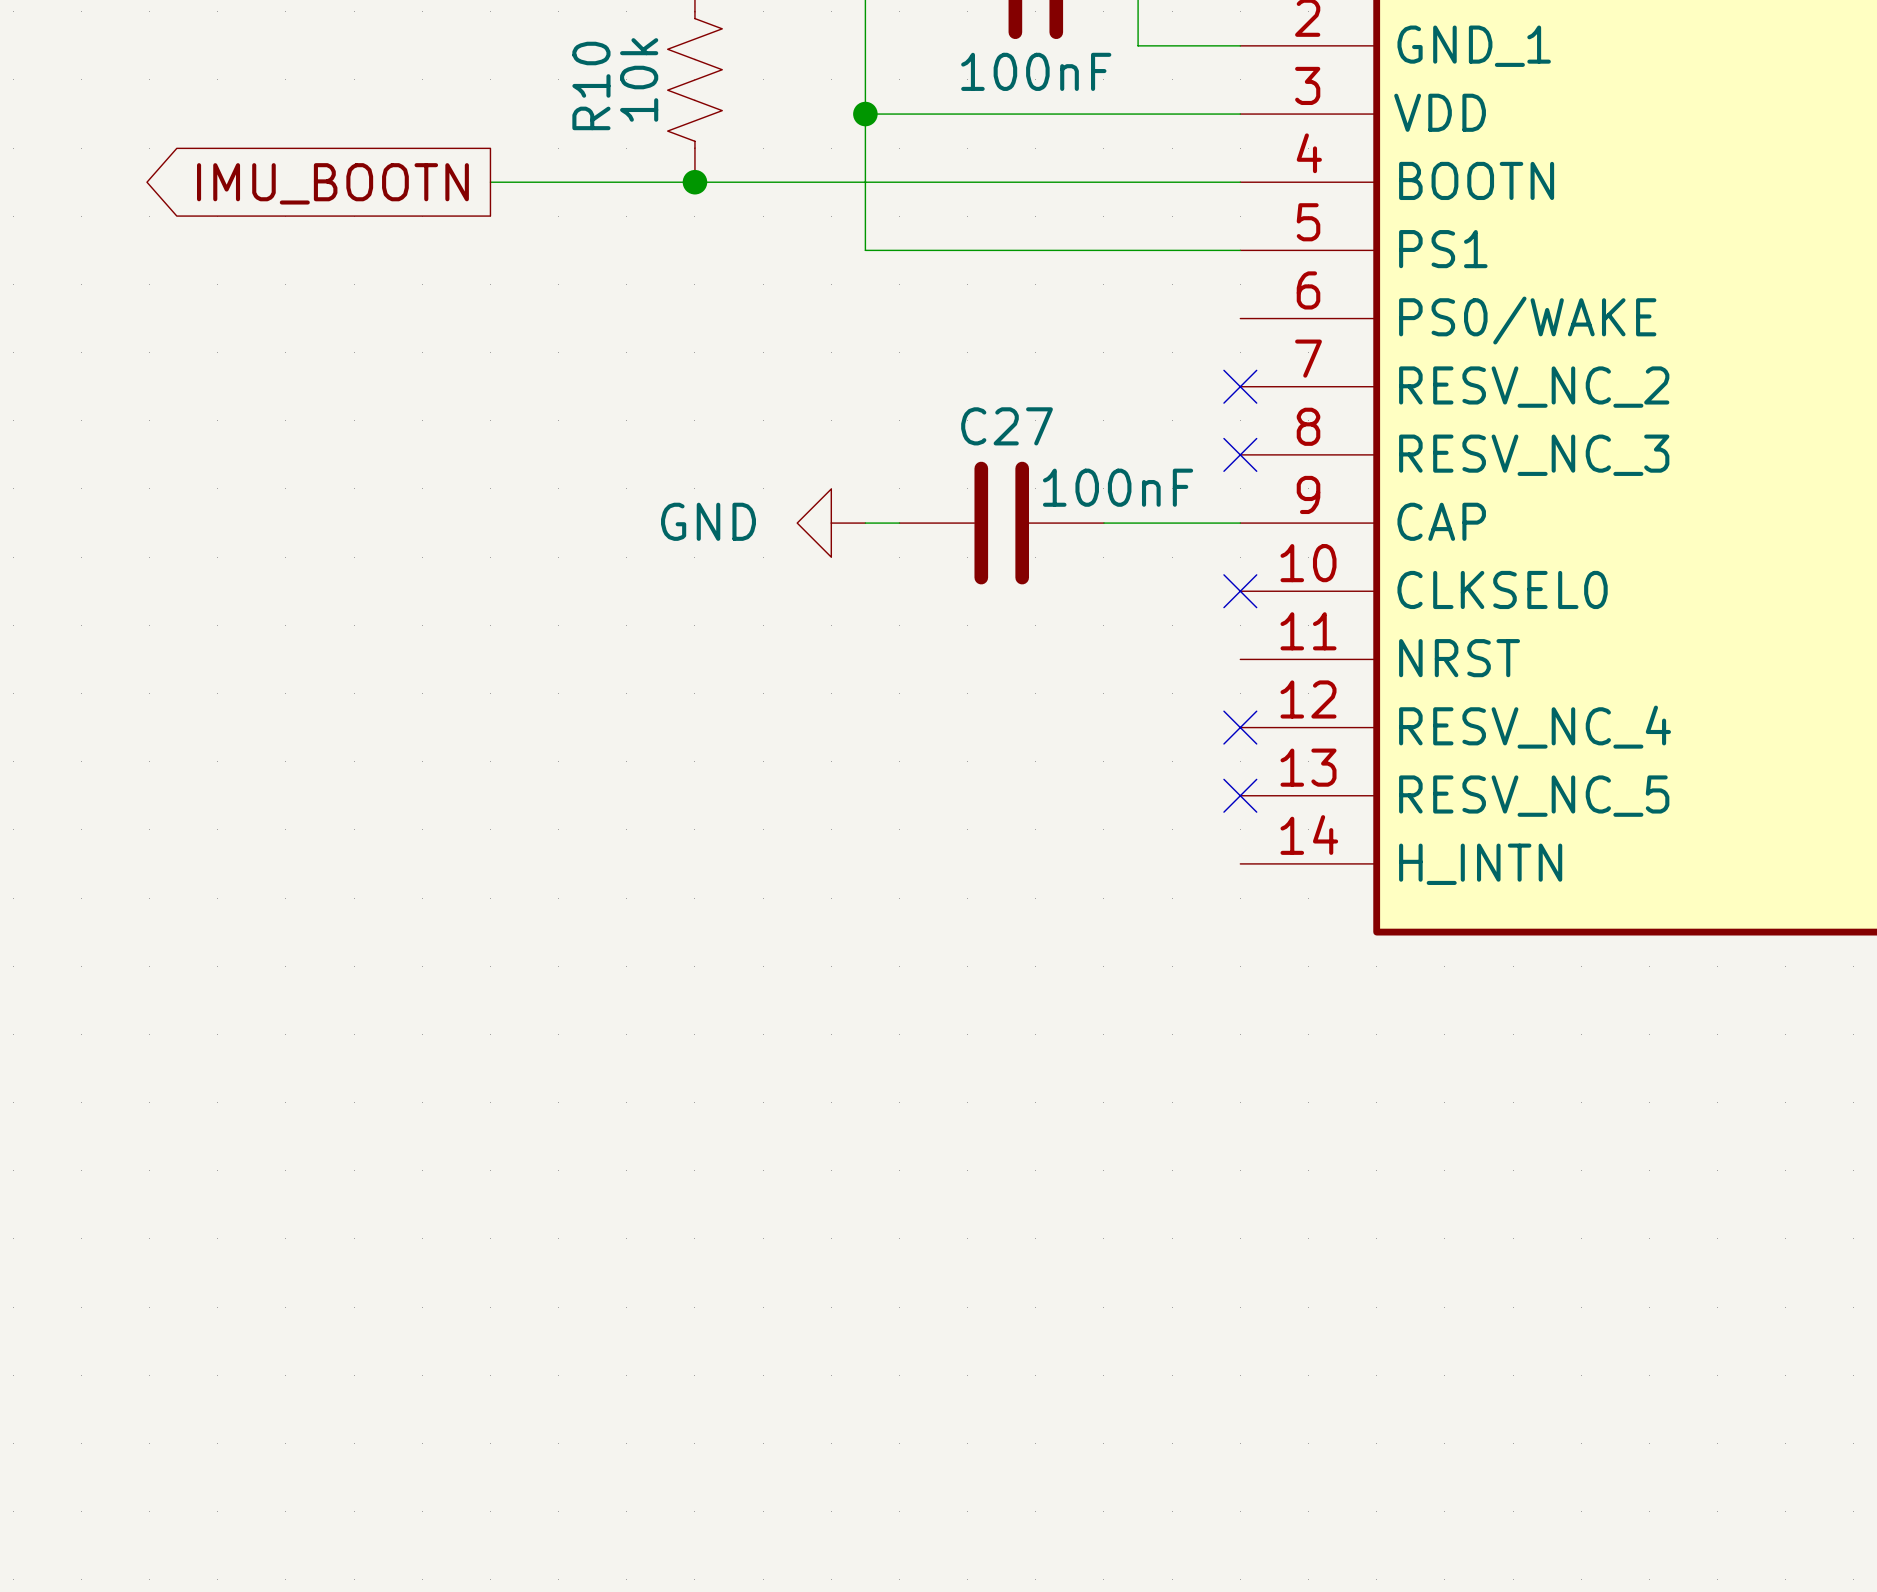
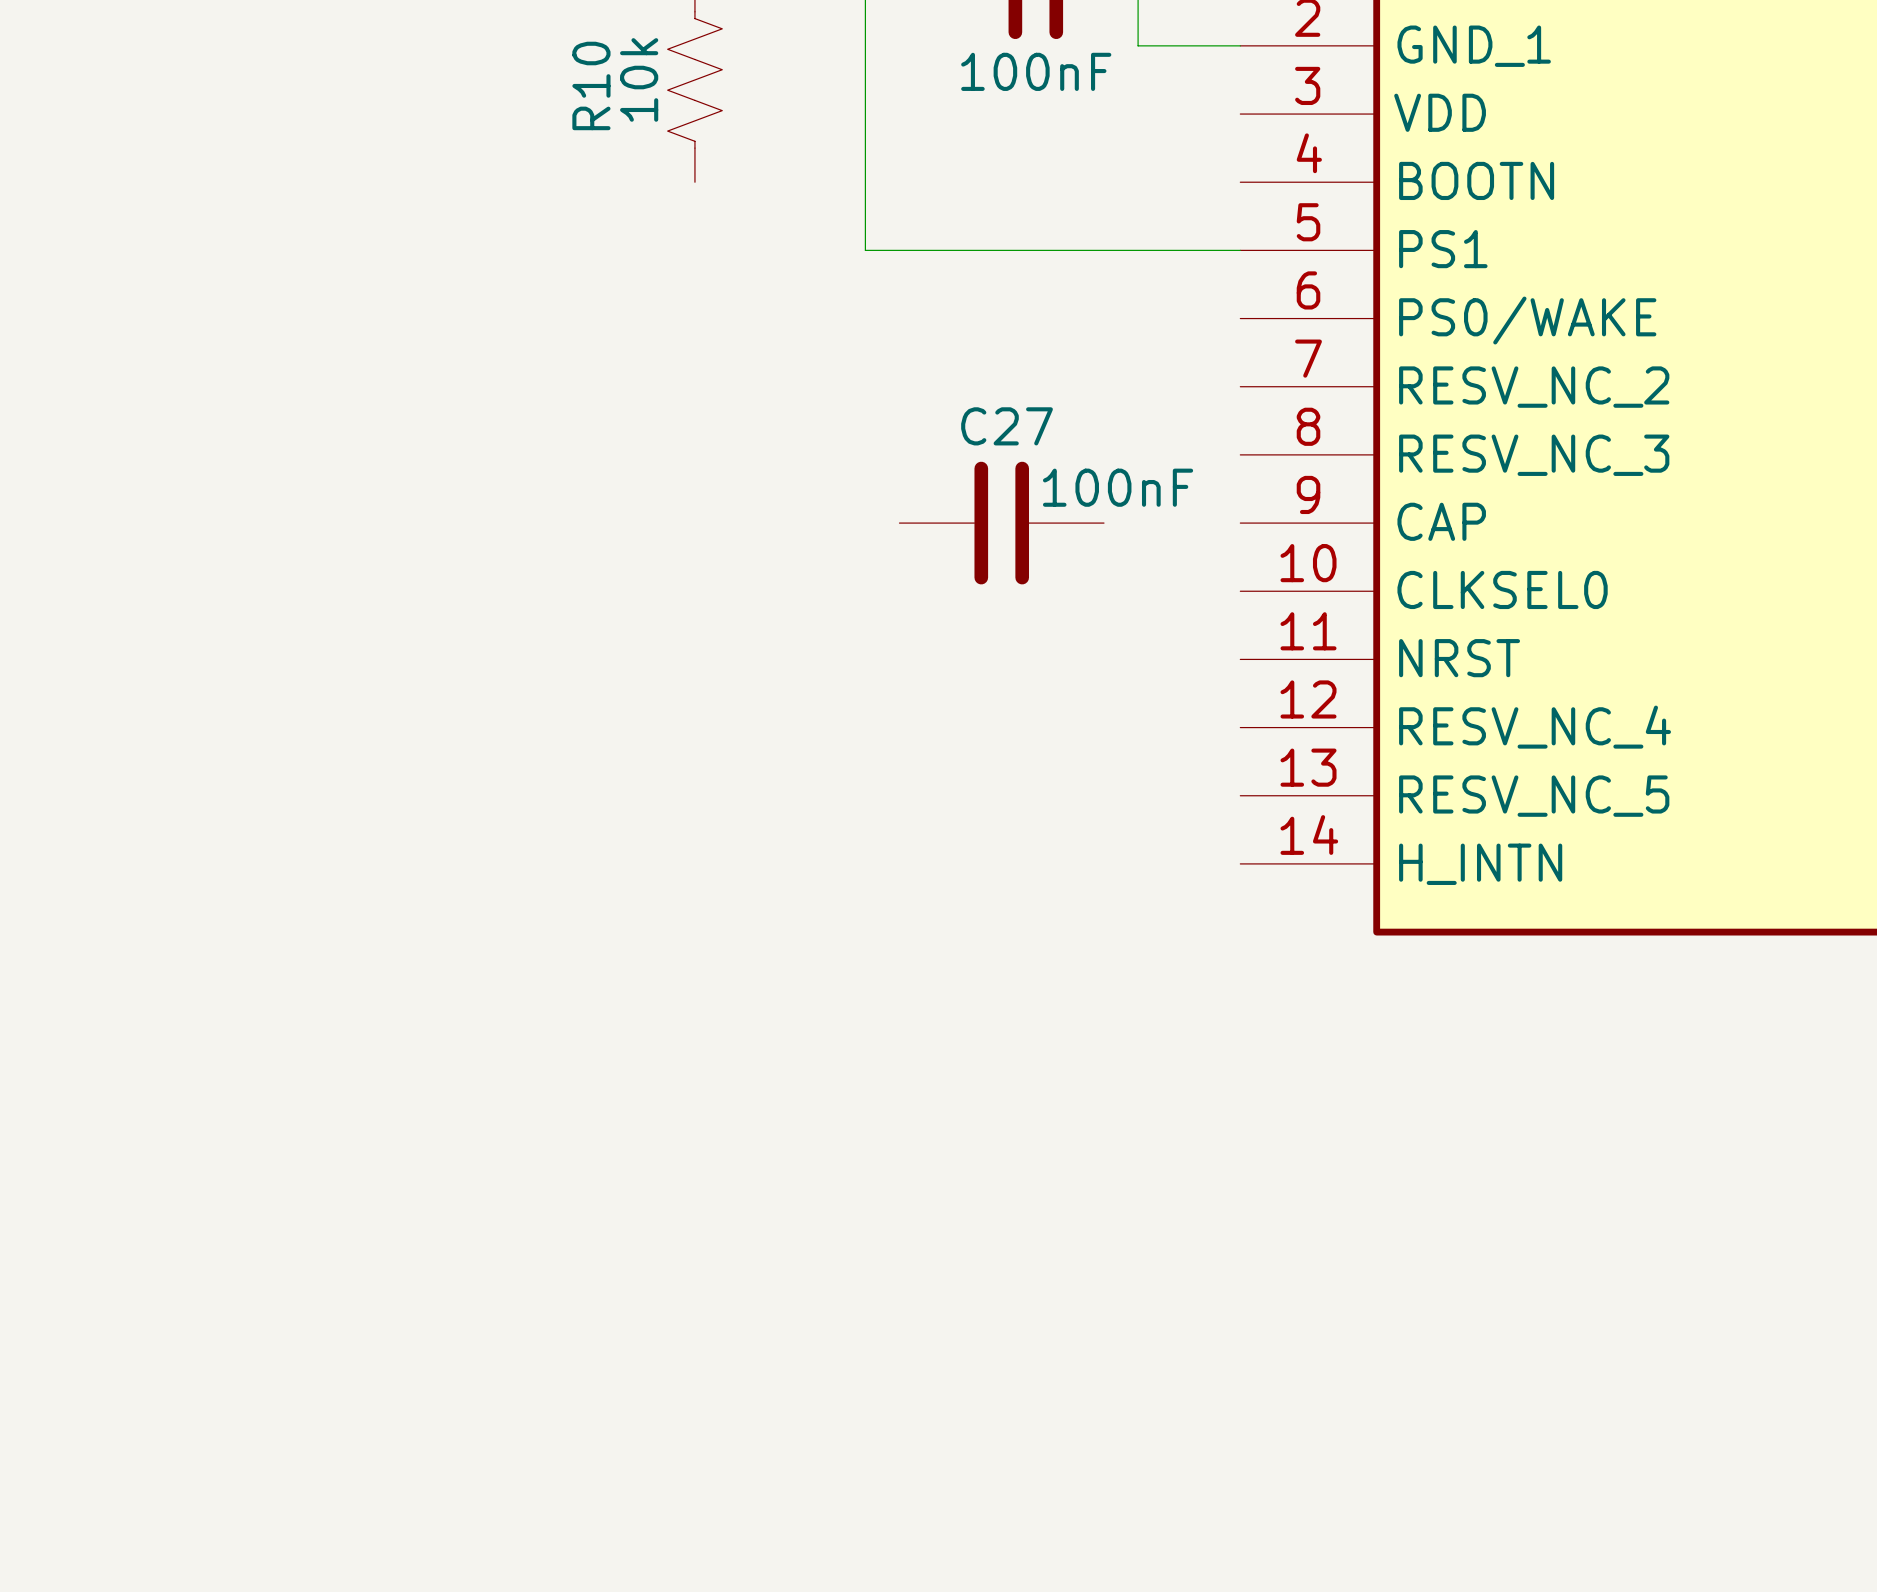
wire: (865, 114) (1240, 114) -> none
junction: (865, 114) -> none
wire: (490, 182) (1240, 182) -> none
junction: (694, 182) -> none
global label: IMU_BOOTN (332, 183) -> none
no-connect mark: (1240, 386) -> none
no-connect mark: (1240, 454) -> none
power symbol: GND (831, 523) -> none
wire: (865, 523) (899, 523) -> none
wire: (1103, 523) (1240, 523) -> none
no-connect mark: (1240, 591) -> none
no-connect mark: (1240, 727) -> none
no-connect mark: (1240, 795) -> none

